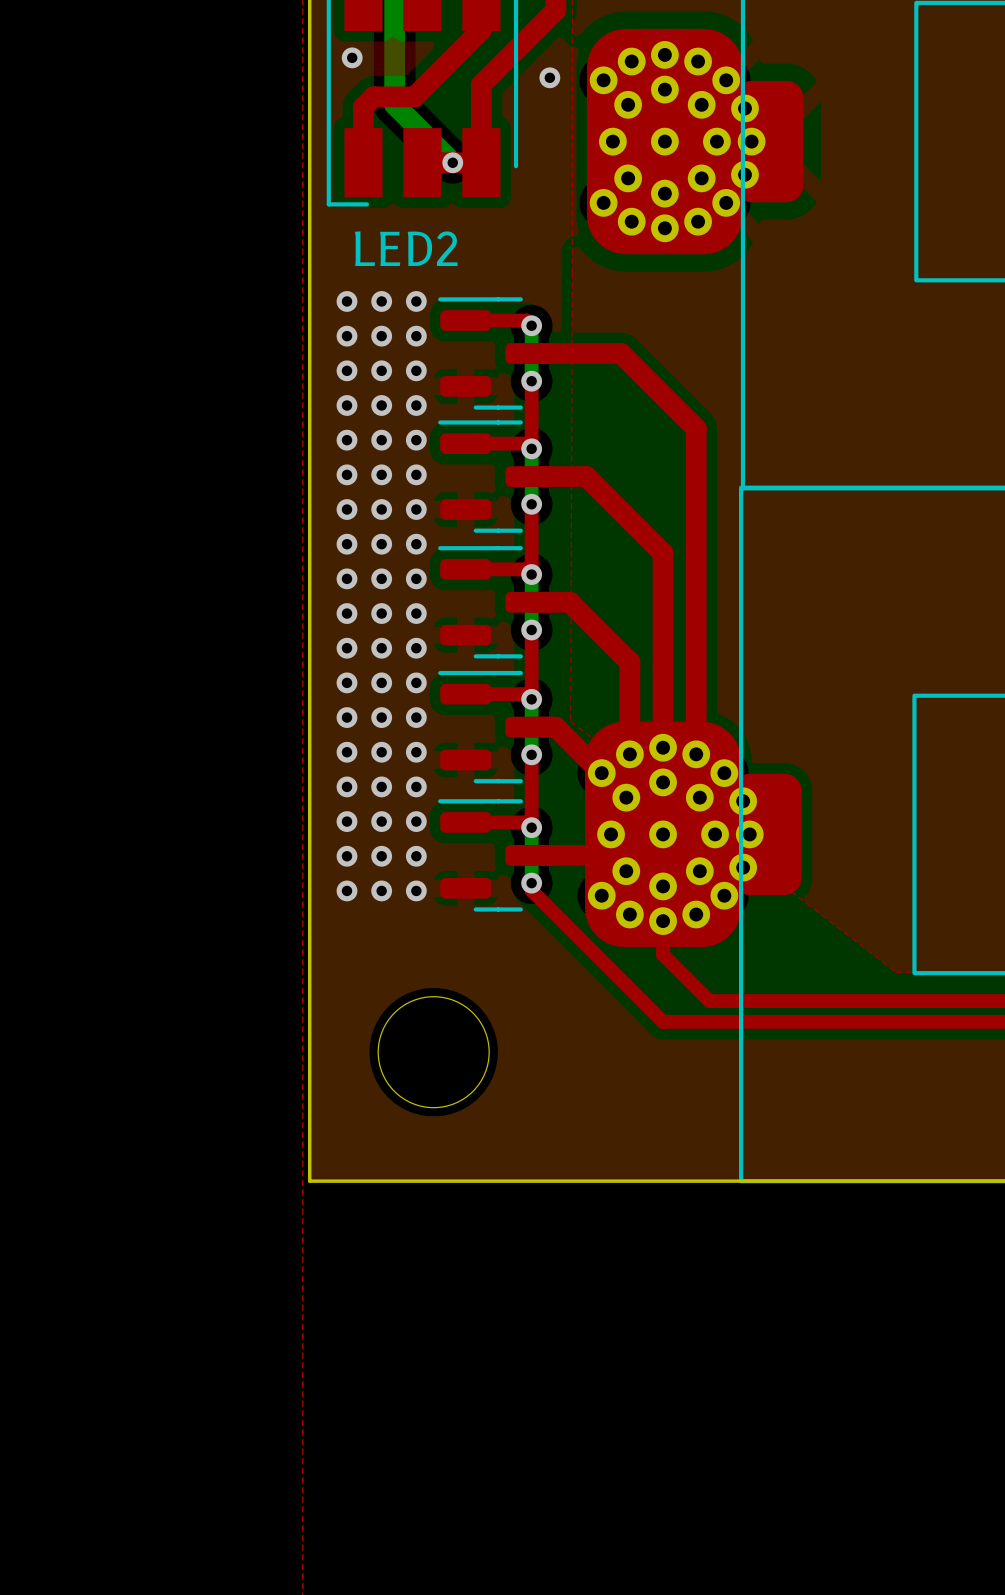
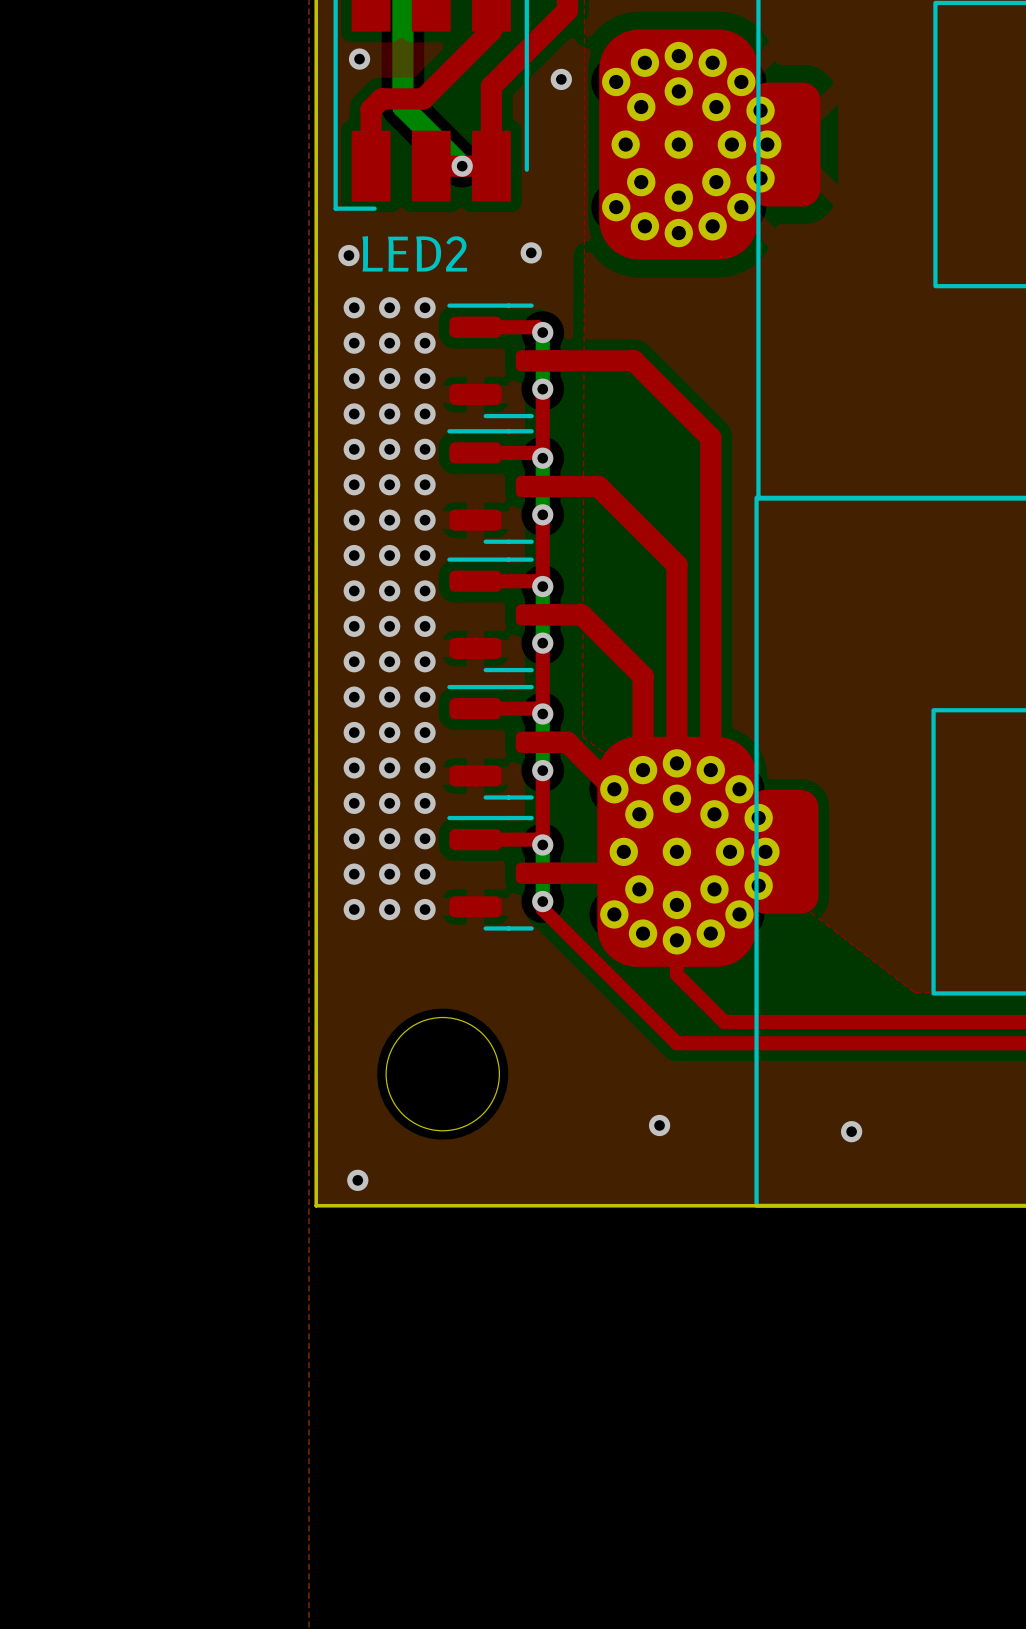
via: none -> (531, 252)
via: none -> (348, 255)
via: none -> (659, 1125)
via: none -> (851, 1131)
via: none -> (357, 1180)

